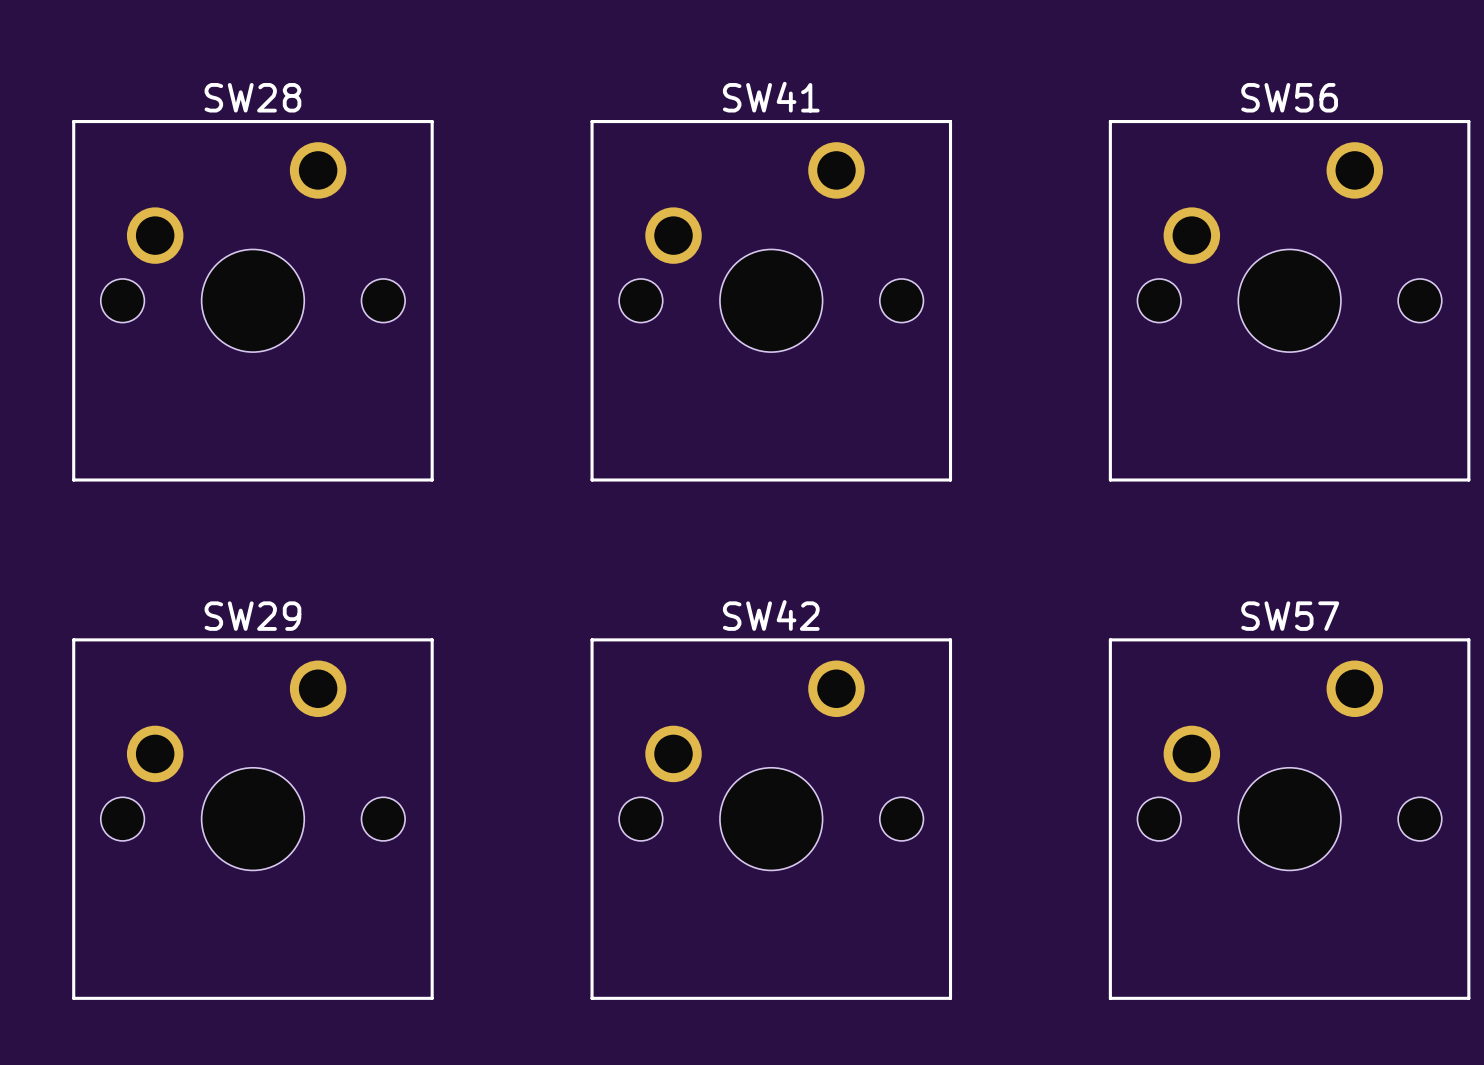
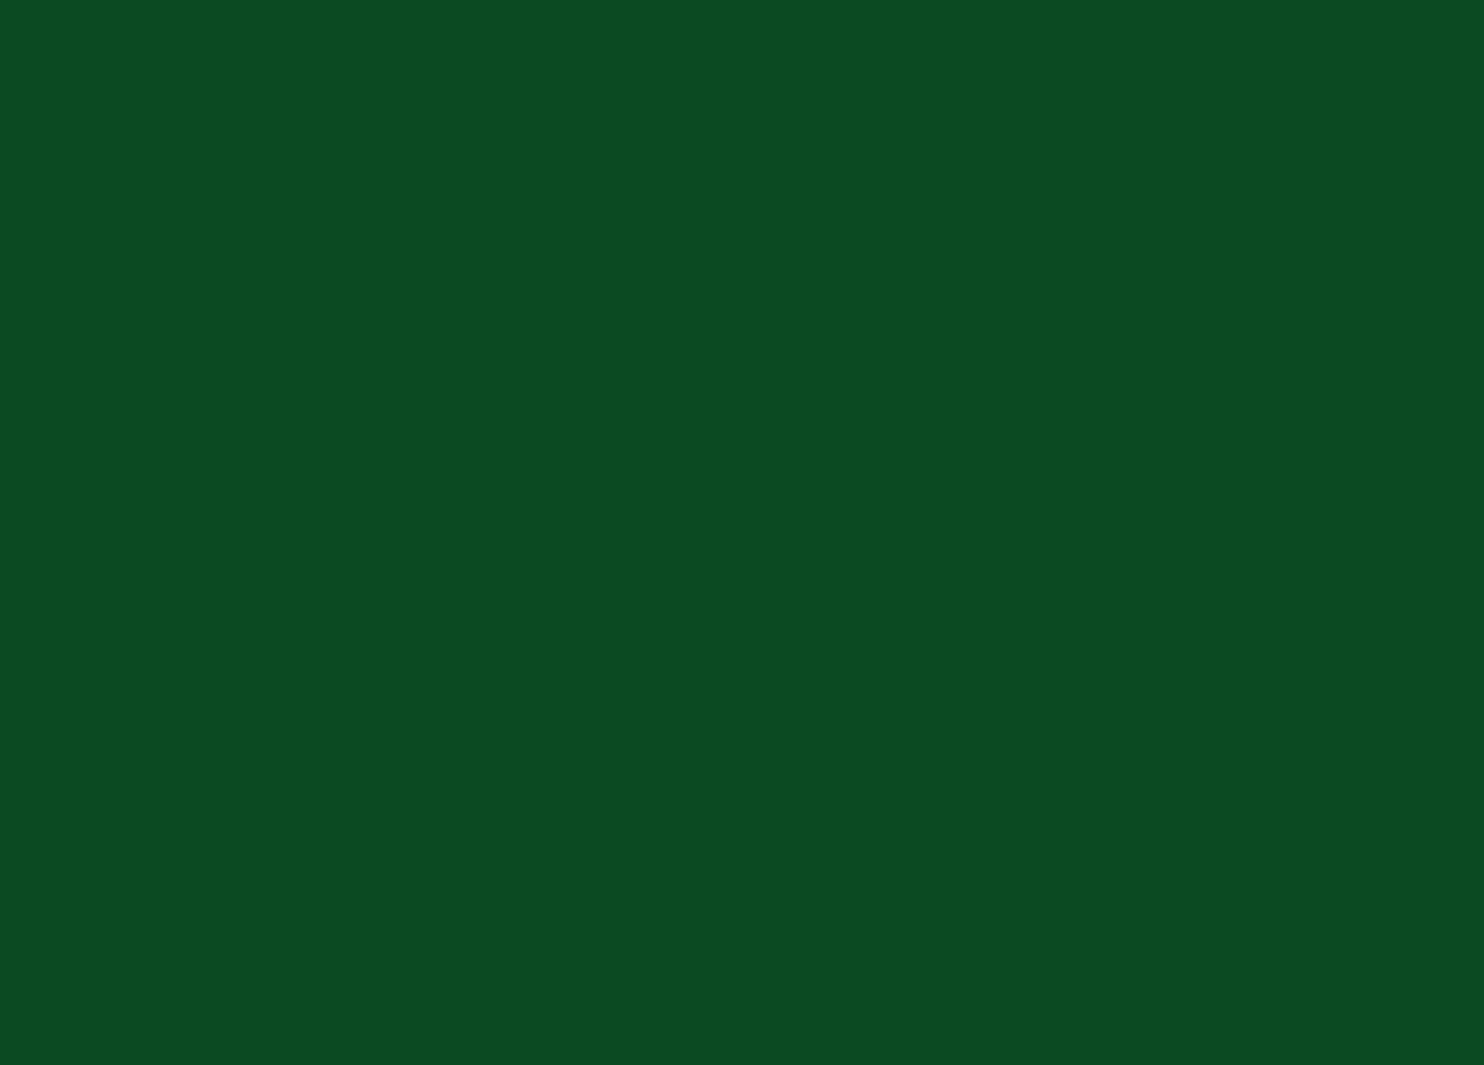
SW28: (252, 300) -> none
SW41: (771, 300) -> none
SW56: (1289, 300) -> none
SW29: (252, 819) -> none
SW42: (771, 819) -> none
SW57: (1289, 819) -> none

